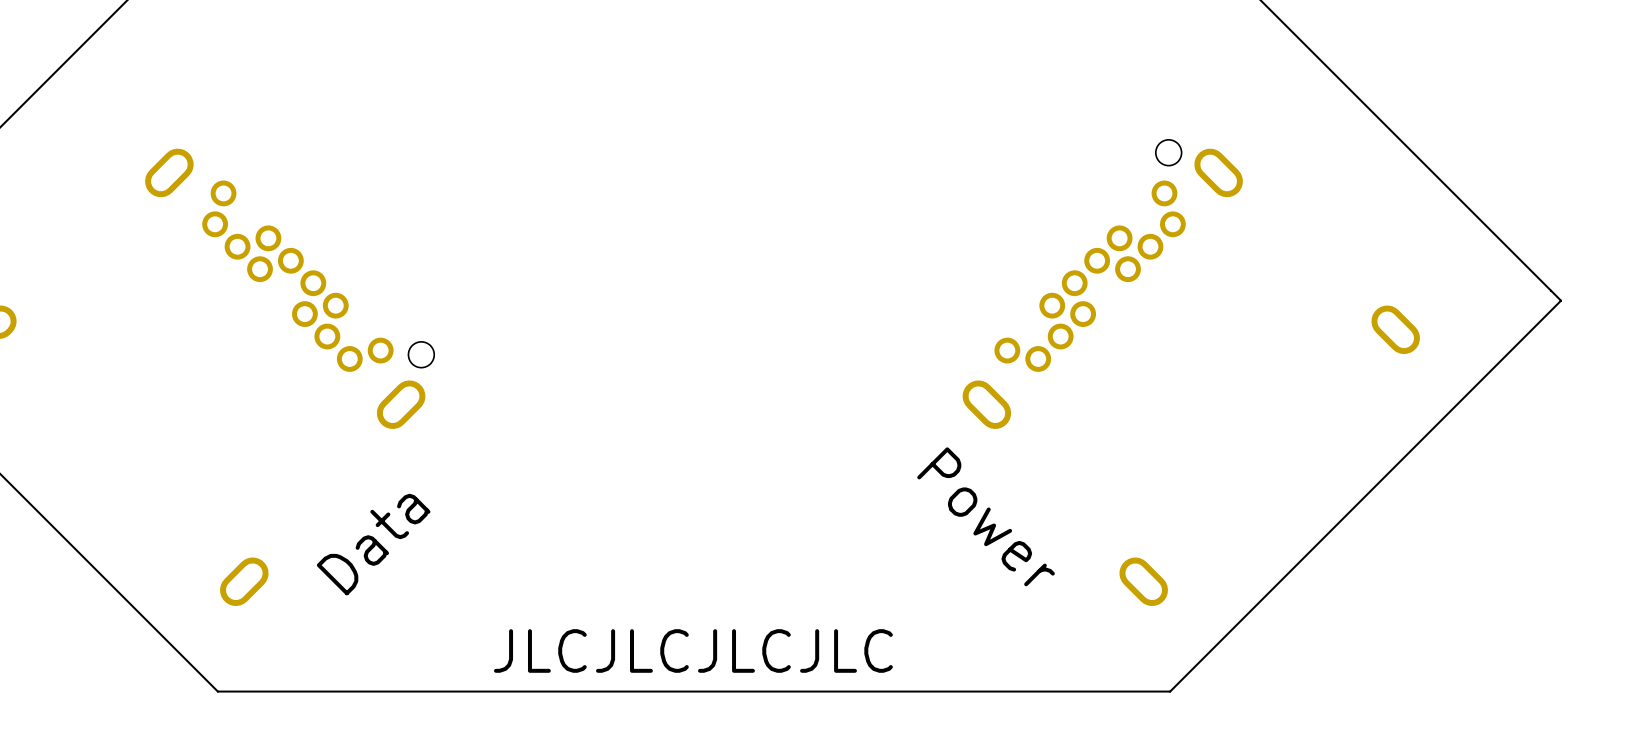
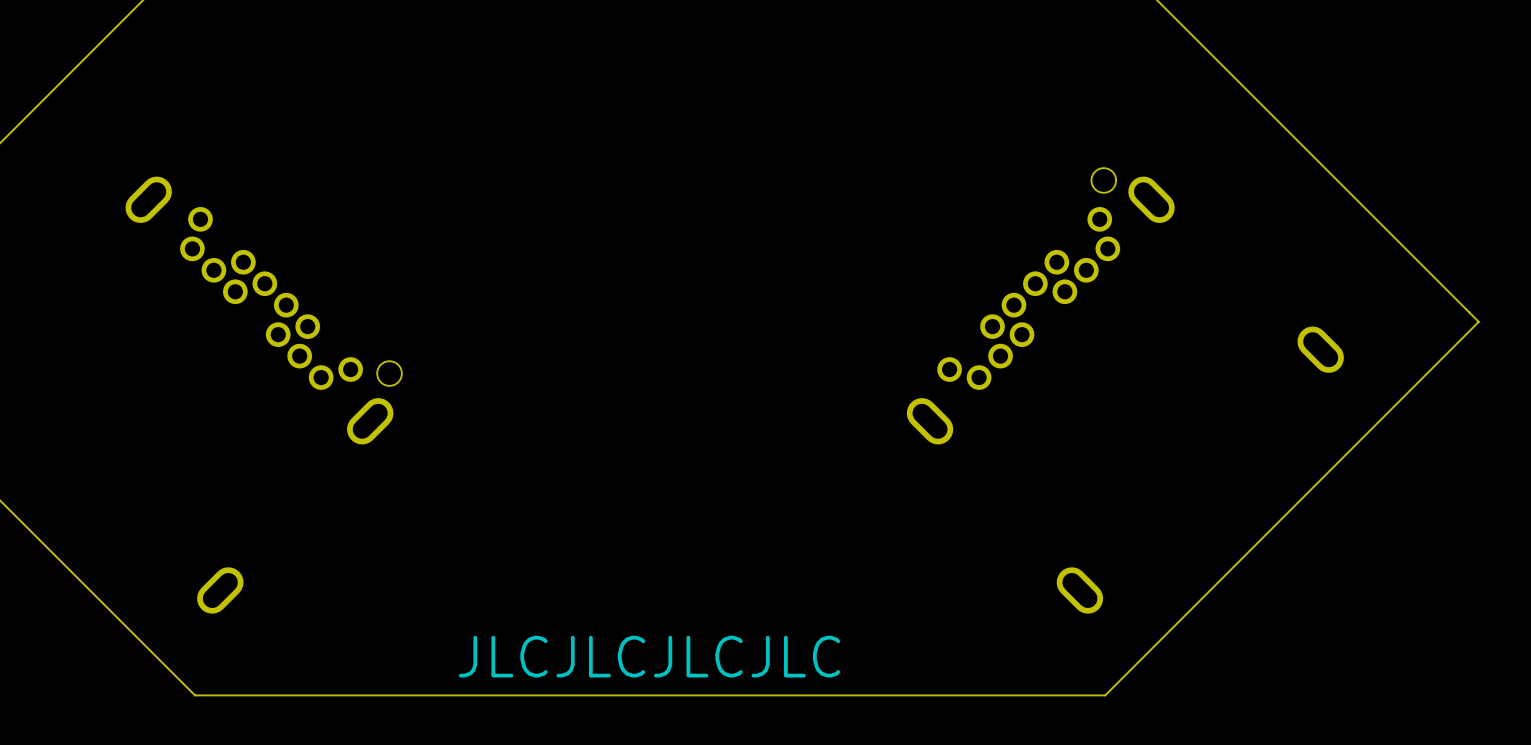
text: Power (986, 516) -> none
text: Data (373, 544) -> none

